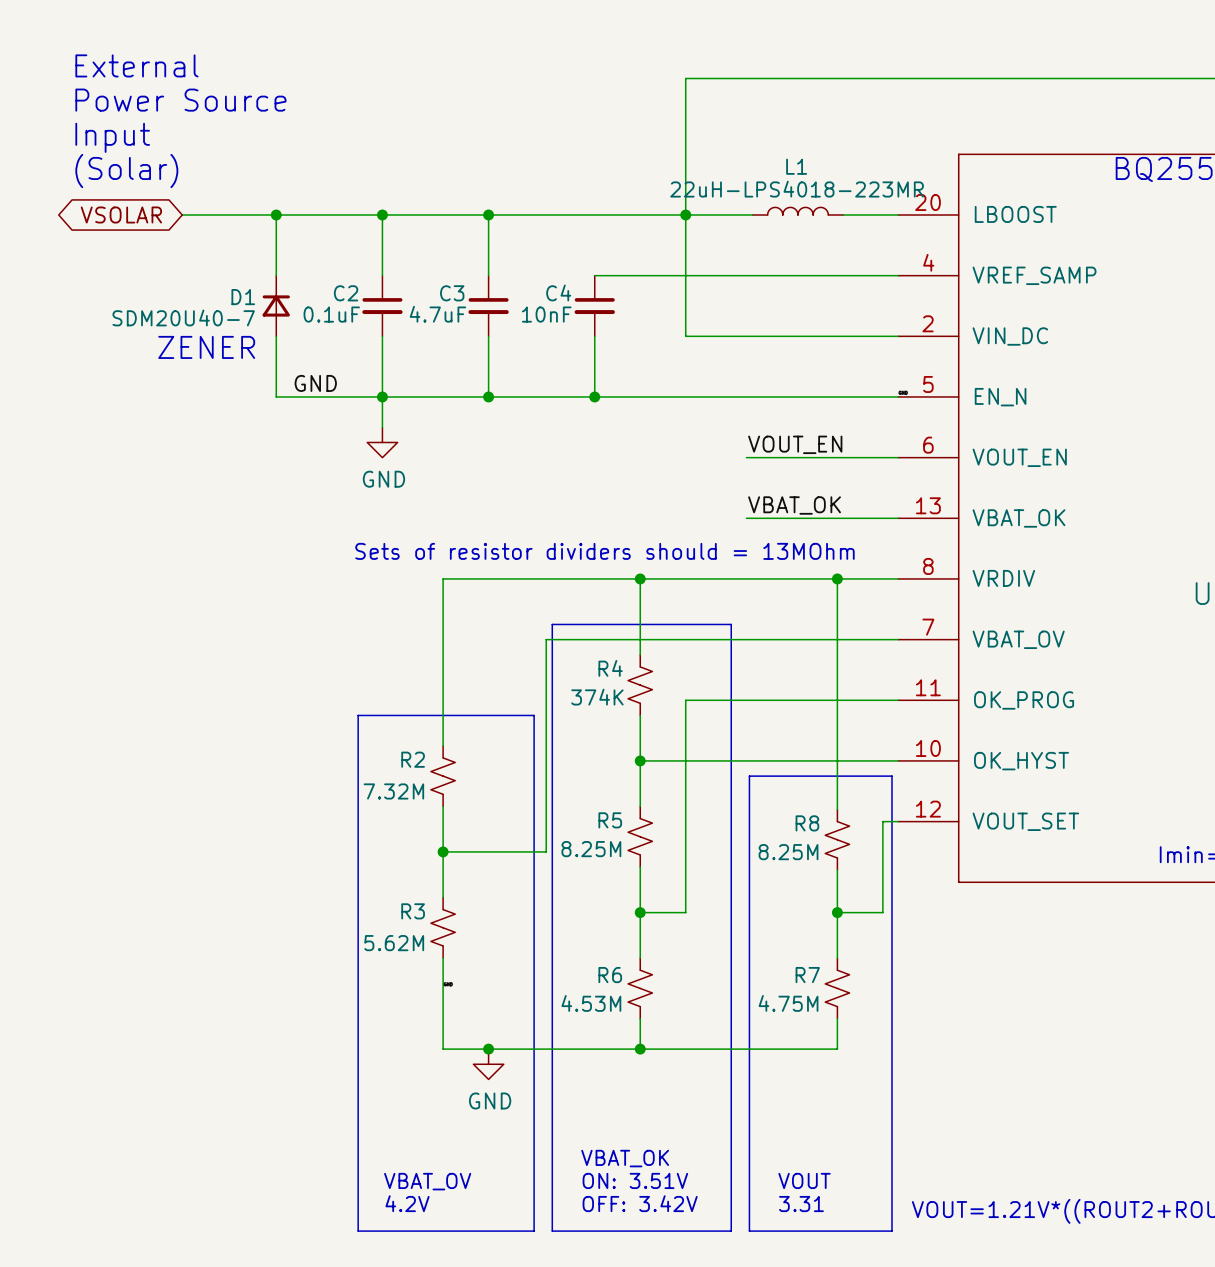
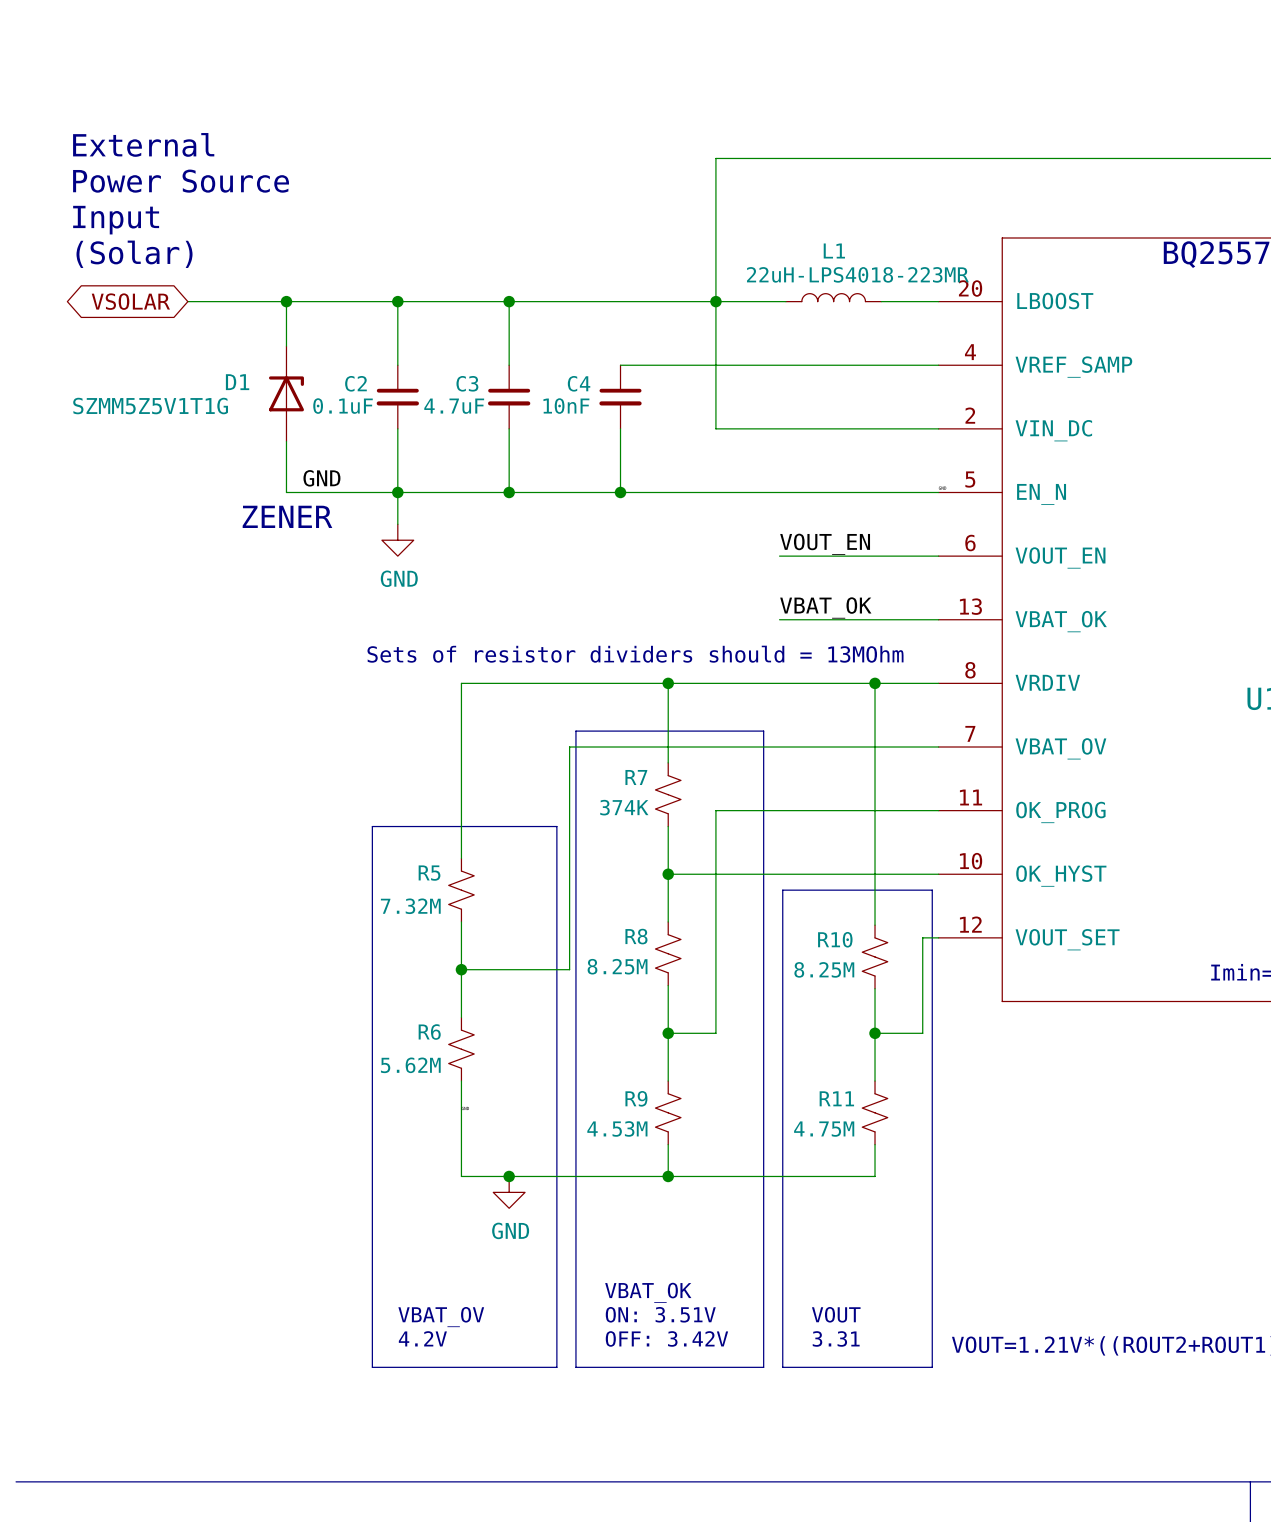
D1 symbol: [262, 275, 290, 337] -> [268, 346, 304, 442]
D1 value: SDM20U40-7 (183, 317) -> SZMM5Z5V1T1G (150, 406)
text position: ZENER (206, 347) -> ZENER (287, 516)
R4 name: R4 (610, 668) -> R7 (636, 777)
R2 name: R2 (413, 759) -> R5 (429, 873)
R5 name: R5 (610, 820) -> R8 (636, 936)
R8 name: R8 (807, 823) -> R10 (835, 939)
R3 name: R3 (413, 911) -> R6 (429, 1032)
R6 name: R6 (610, 975) -> R9 (636, 1098)
R7 name: R7 (807, 975) -> R11 (836, 1098)

